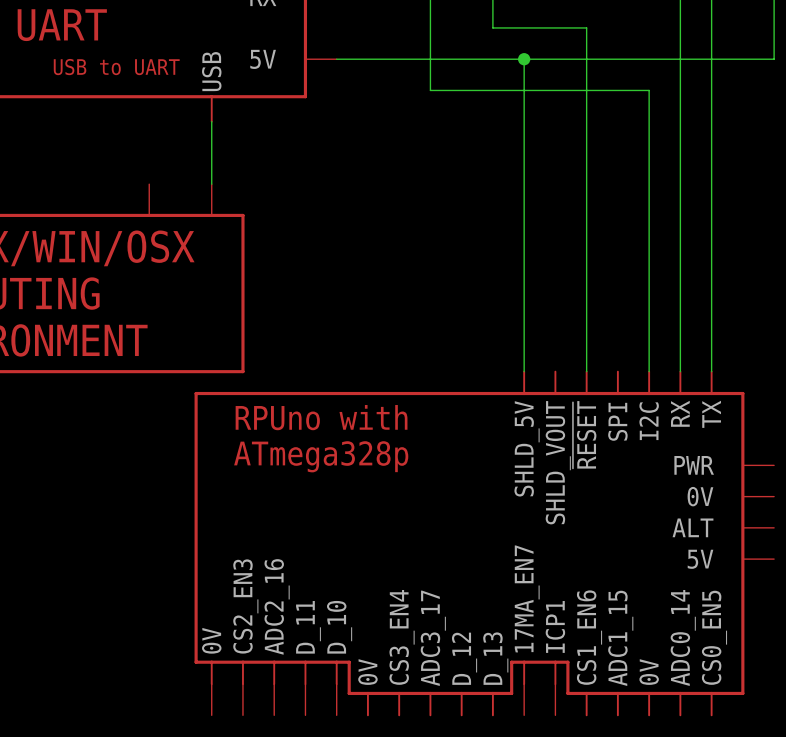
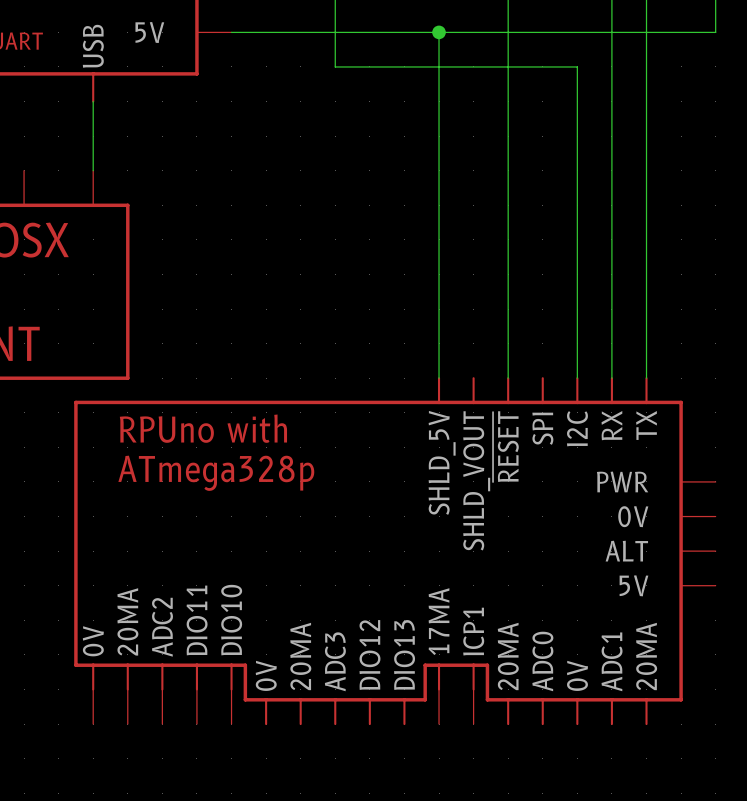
part: none -> (394, 551)
part: (484, 543) -> none

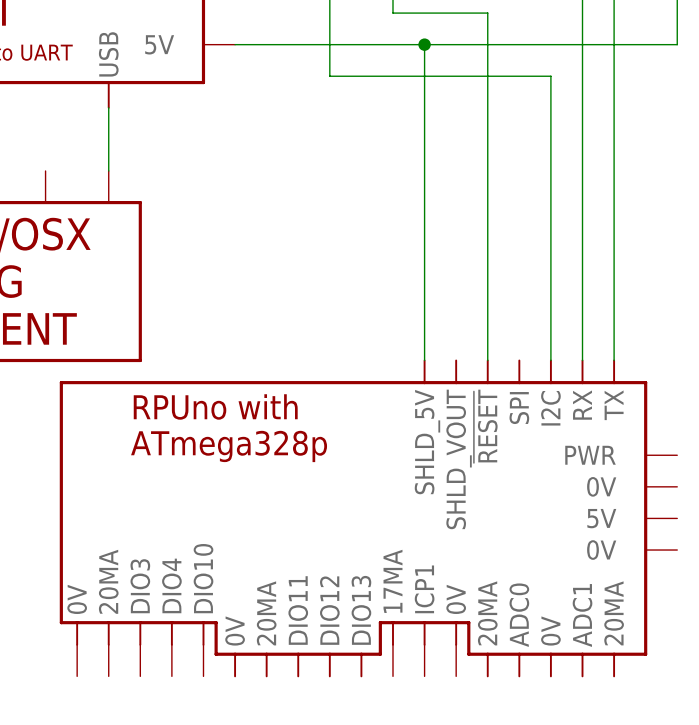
part: none -> (368, 518)
part: (394, 551) -> none

